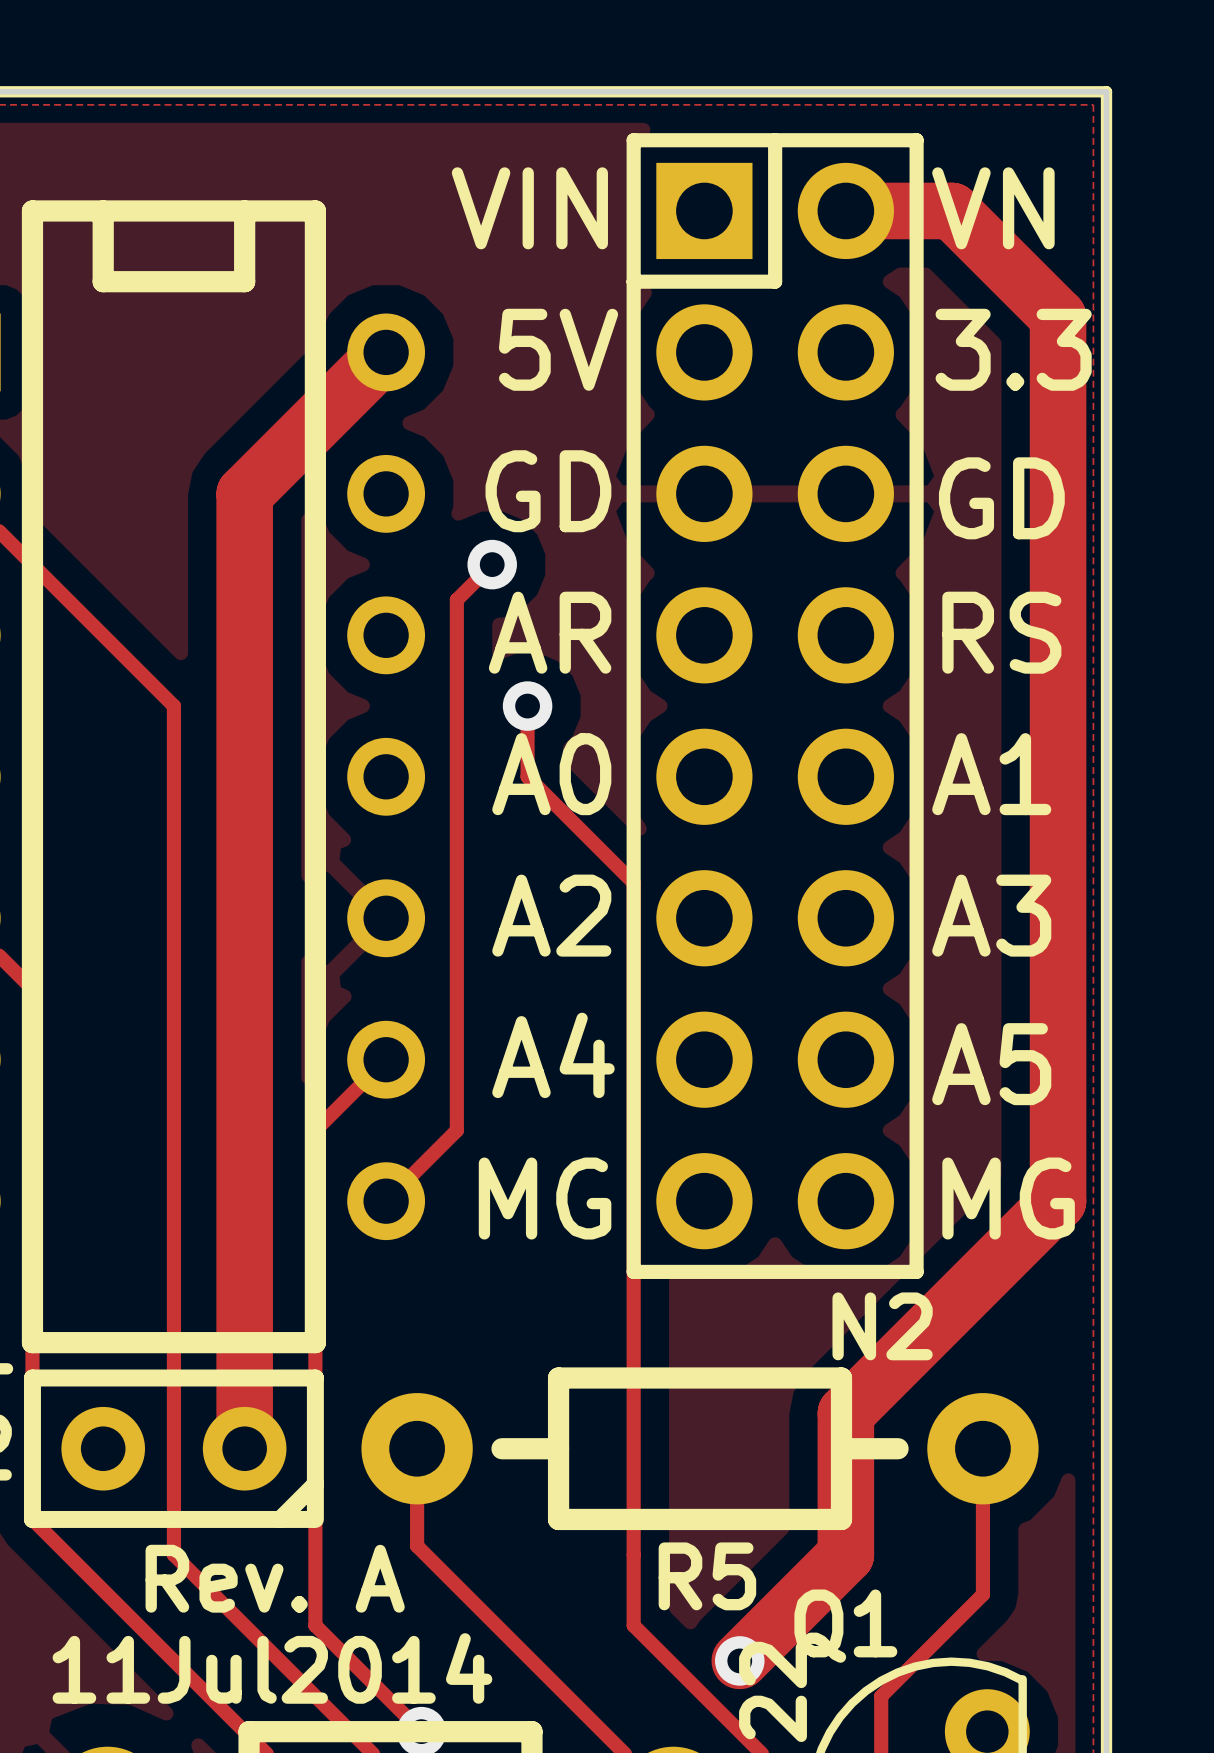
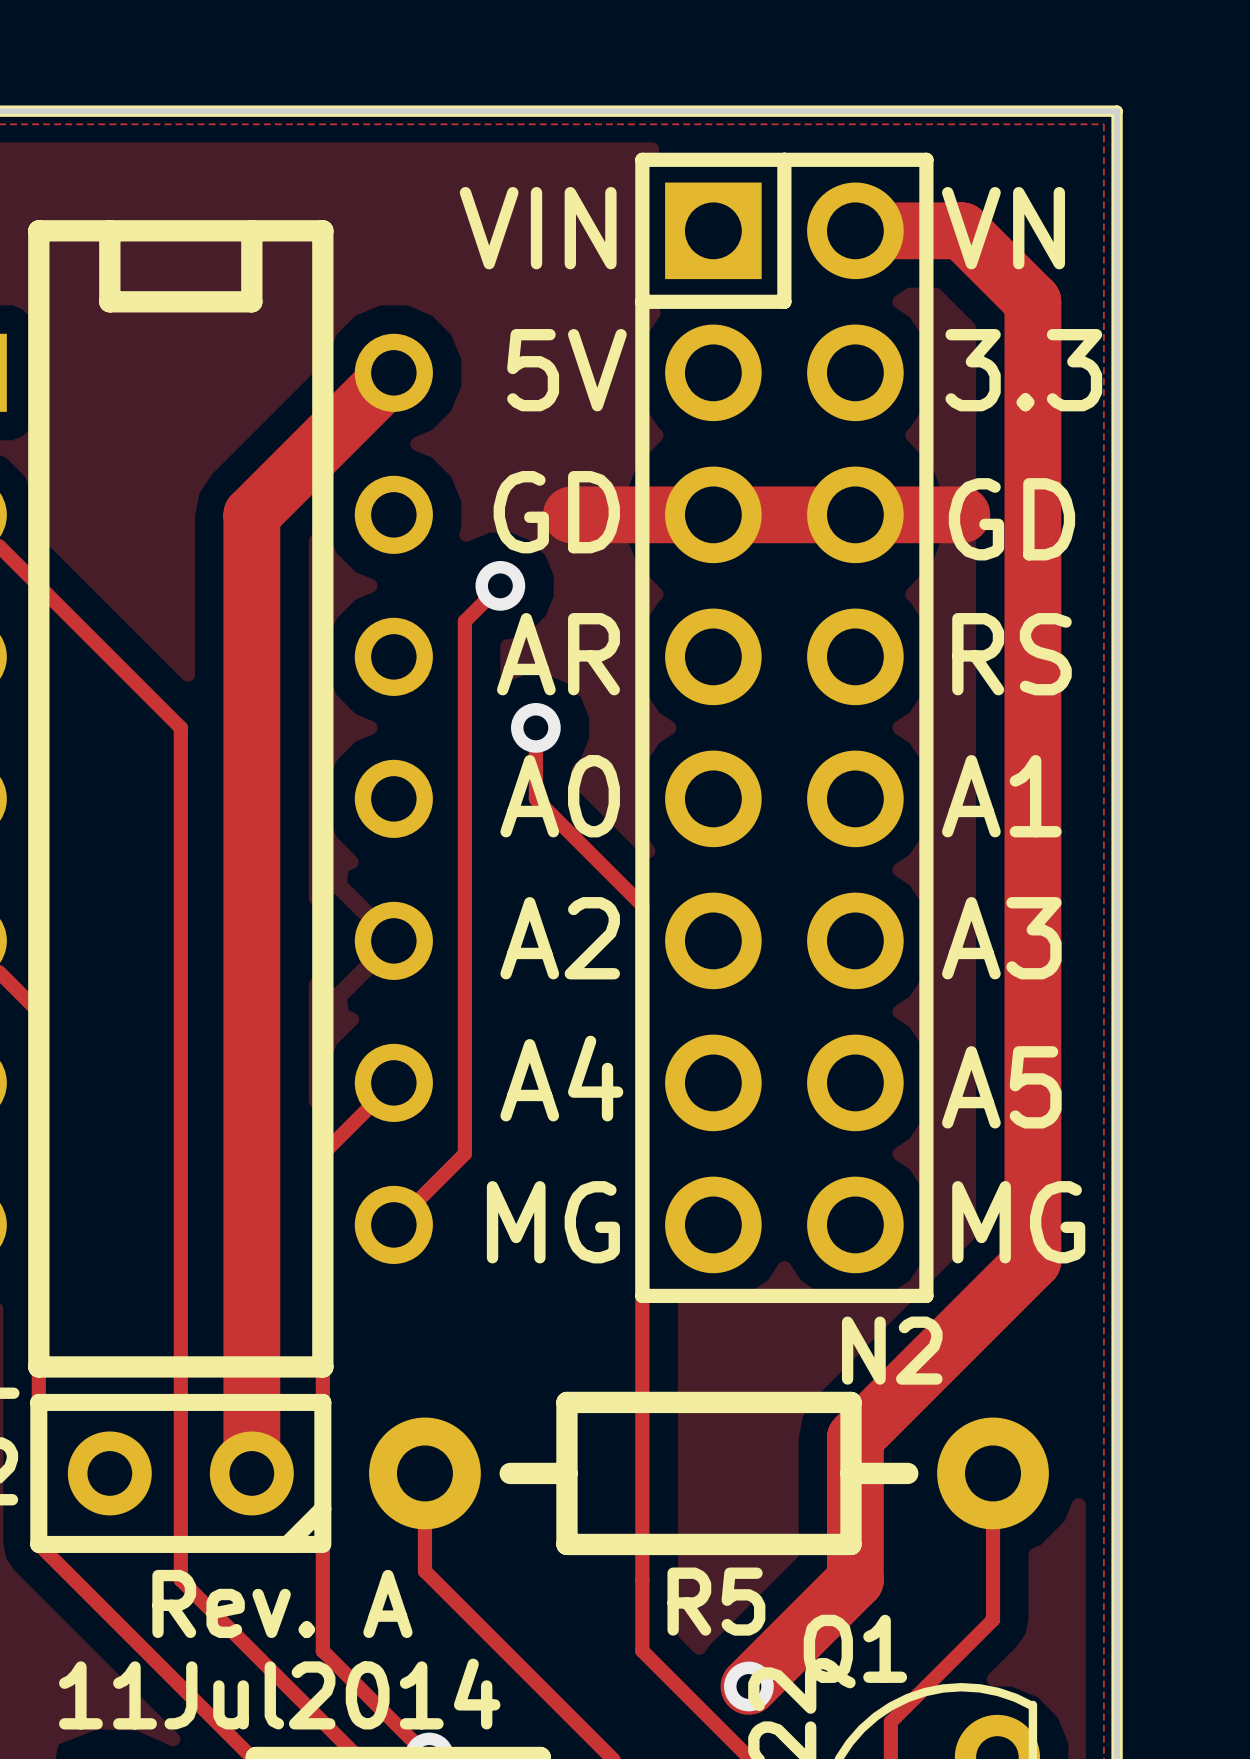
track: (1022, 281) (1058, 317) (1058, 1201) (1022, 1236) -> (1032, 301) (1032, 1260)
track: none -> (571, 514) (961, 514)

